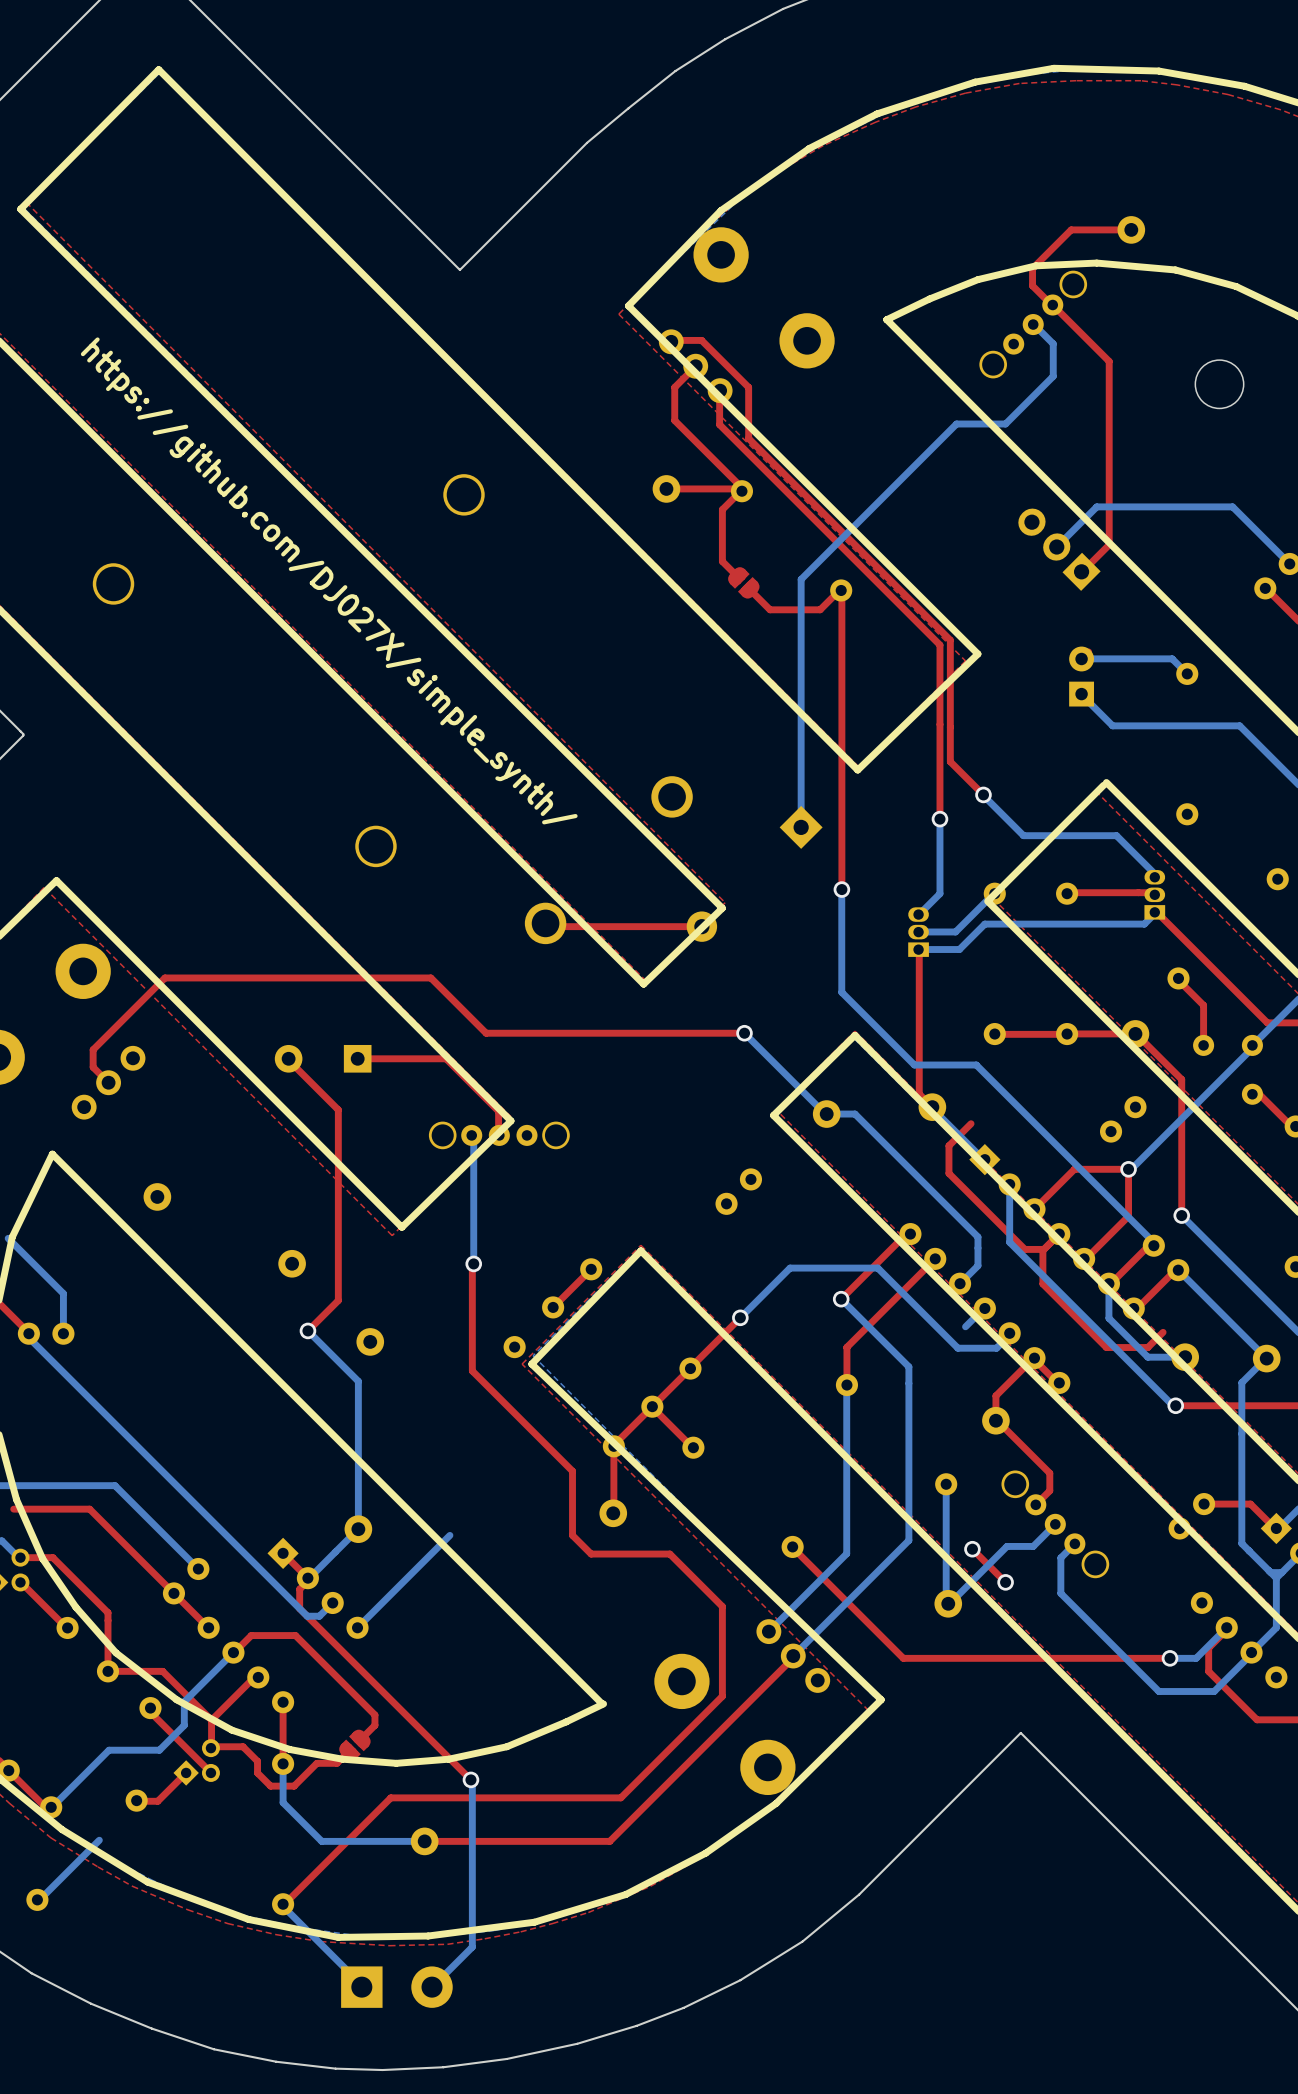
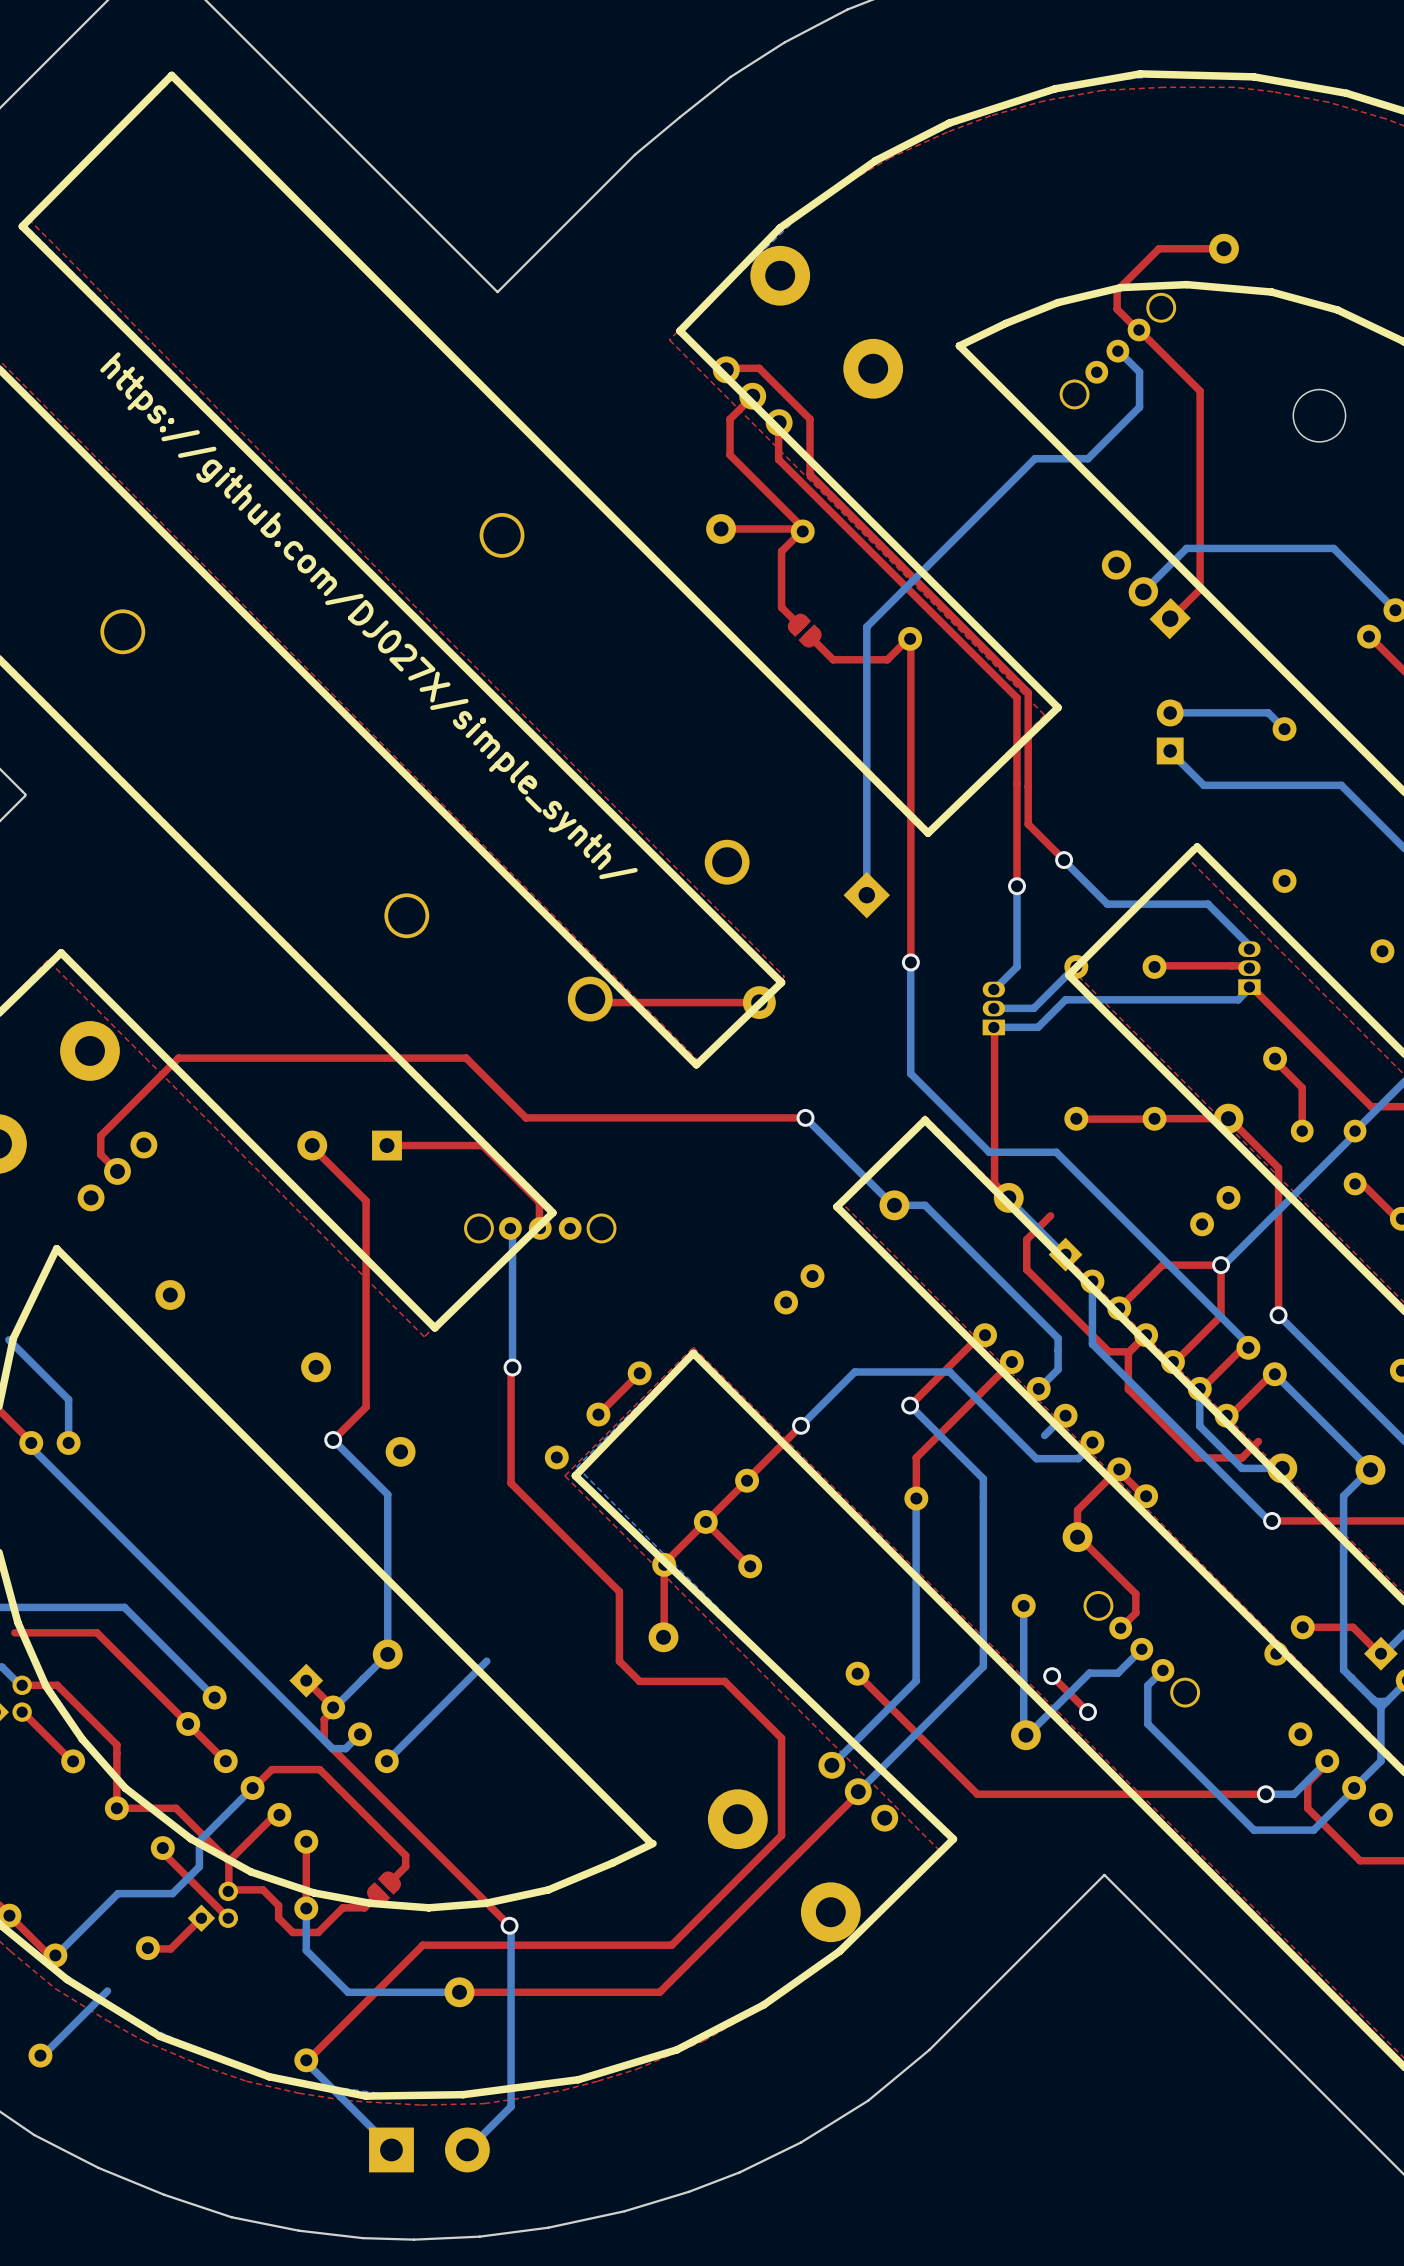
text position: https://github.com/DJ027X/simple_synth/ (329, 580) -> https://github.com/DJ027X/simple_synth/ (368, 615)

